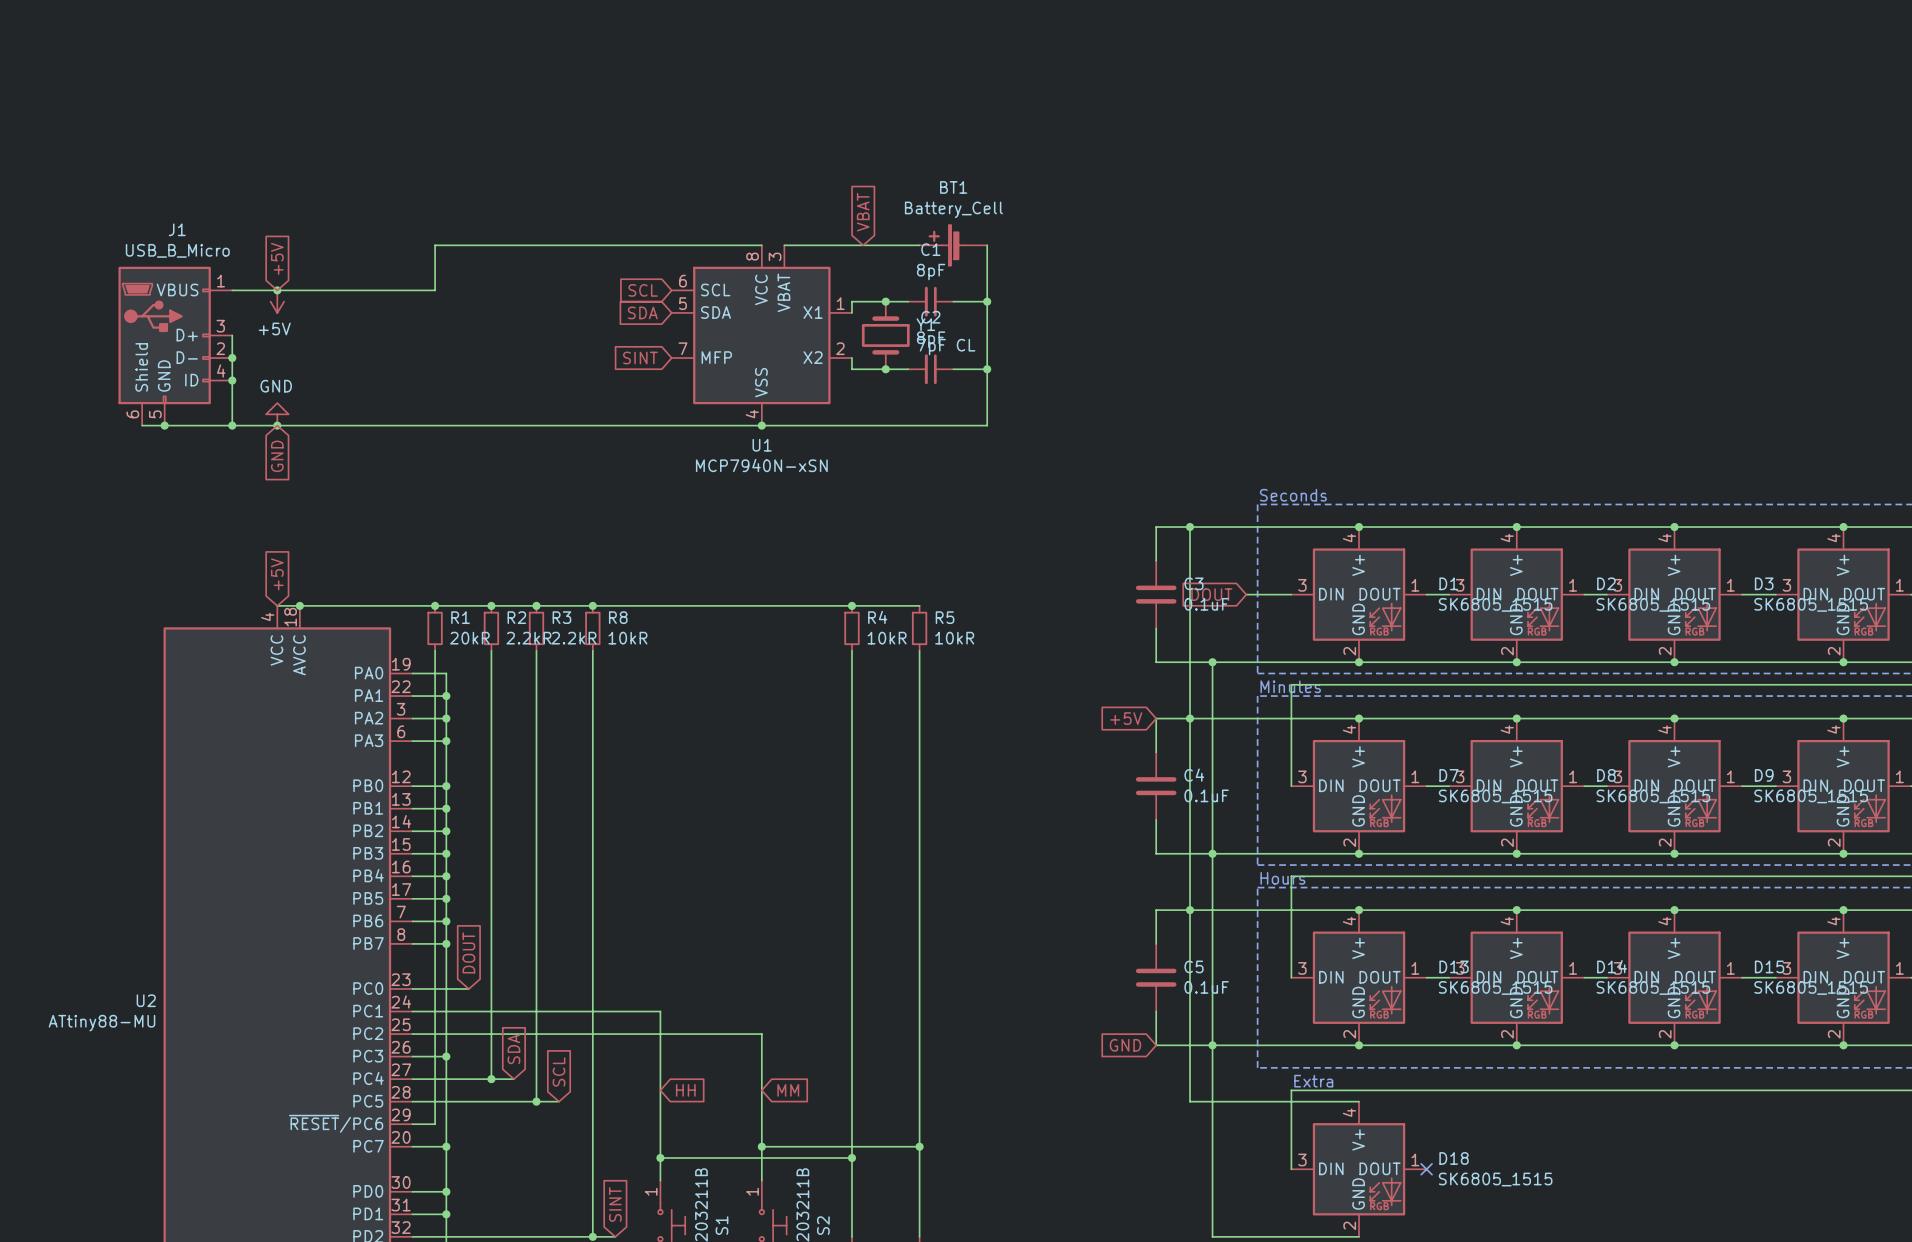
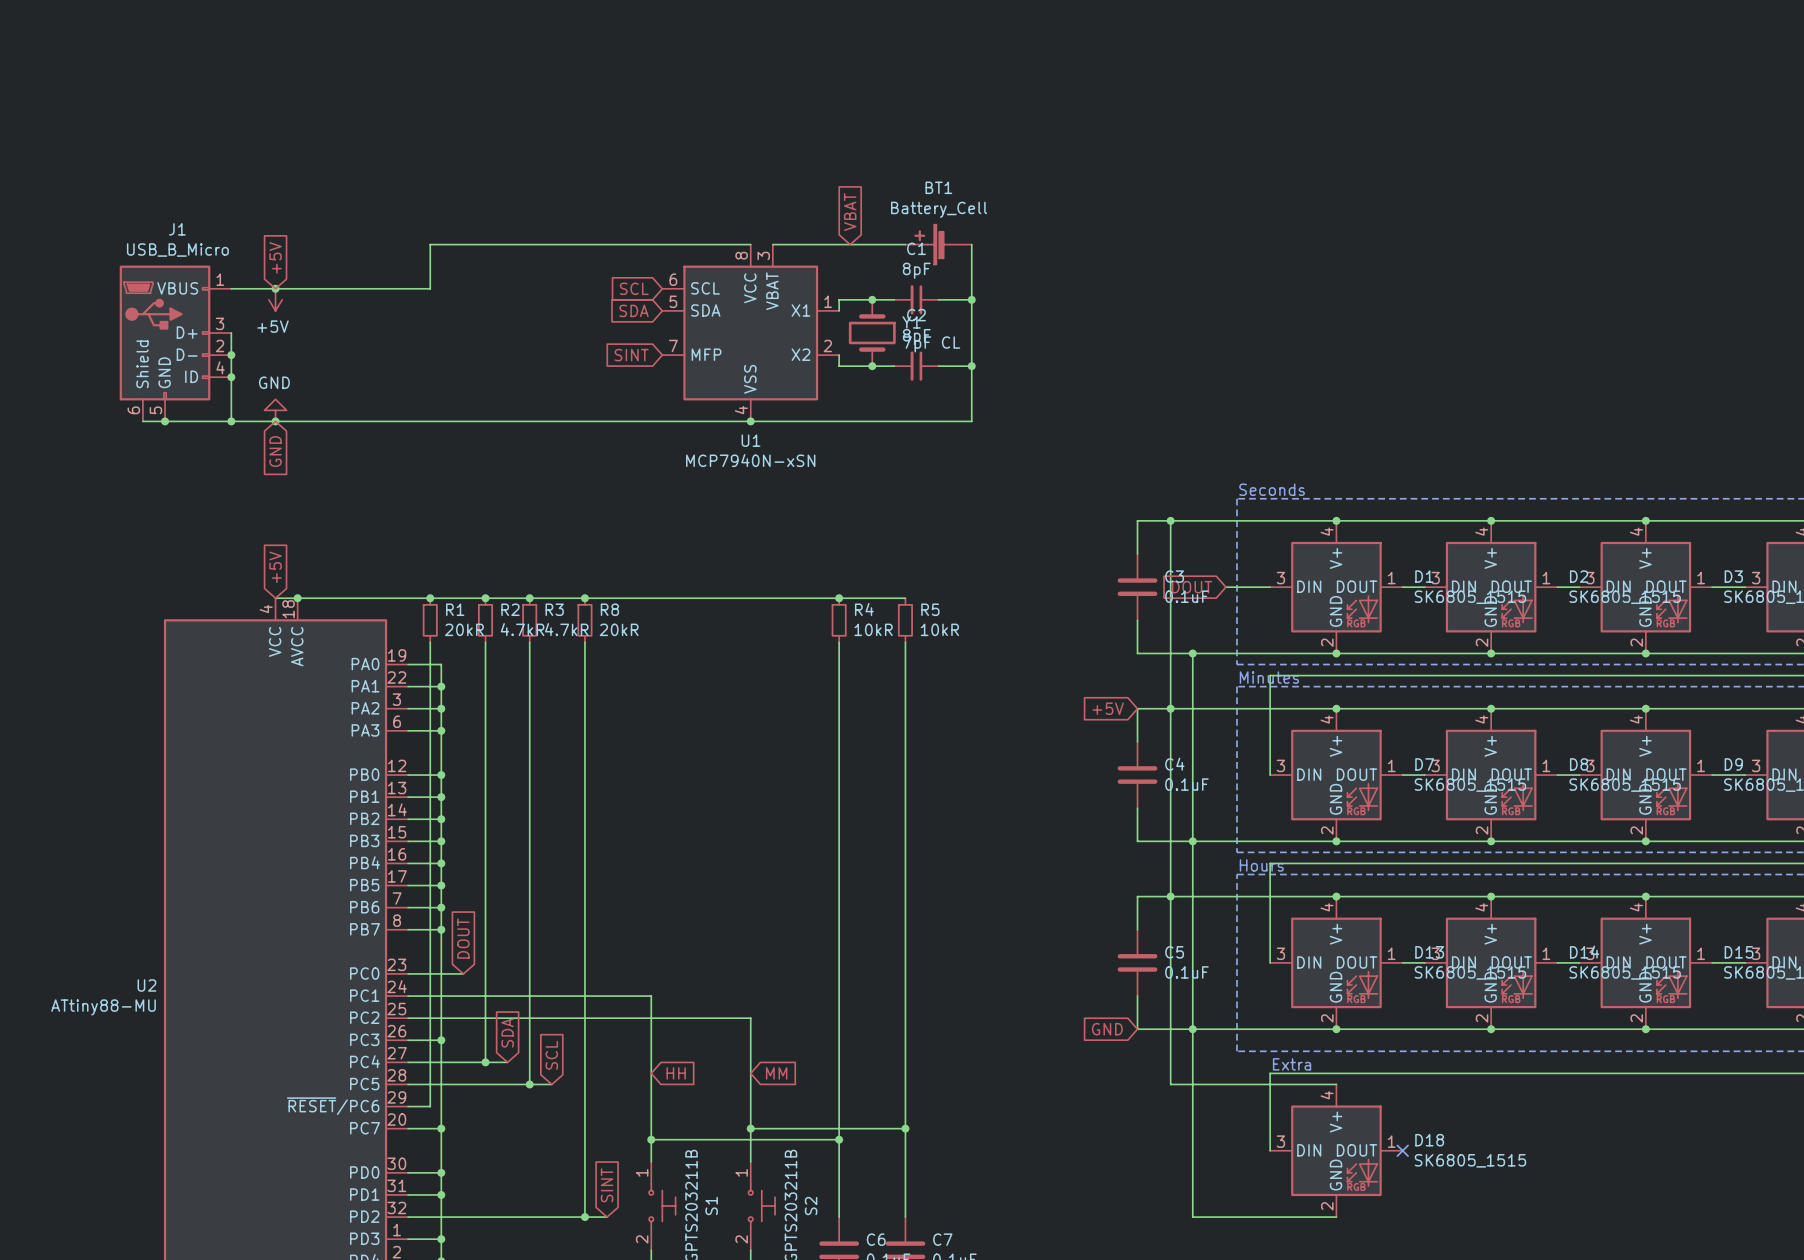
R2 value: 2.2kR (528, 638) -> 4.7kR (522, 629)
R3 value: 2.2kR (574, 638) -> 4.7kR (566, 629)
R8 value: 10kR (627, 638) -> 20kR (619, 629)

